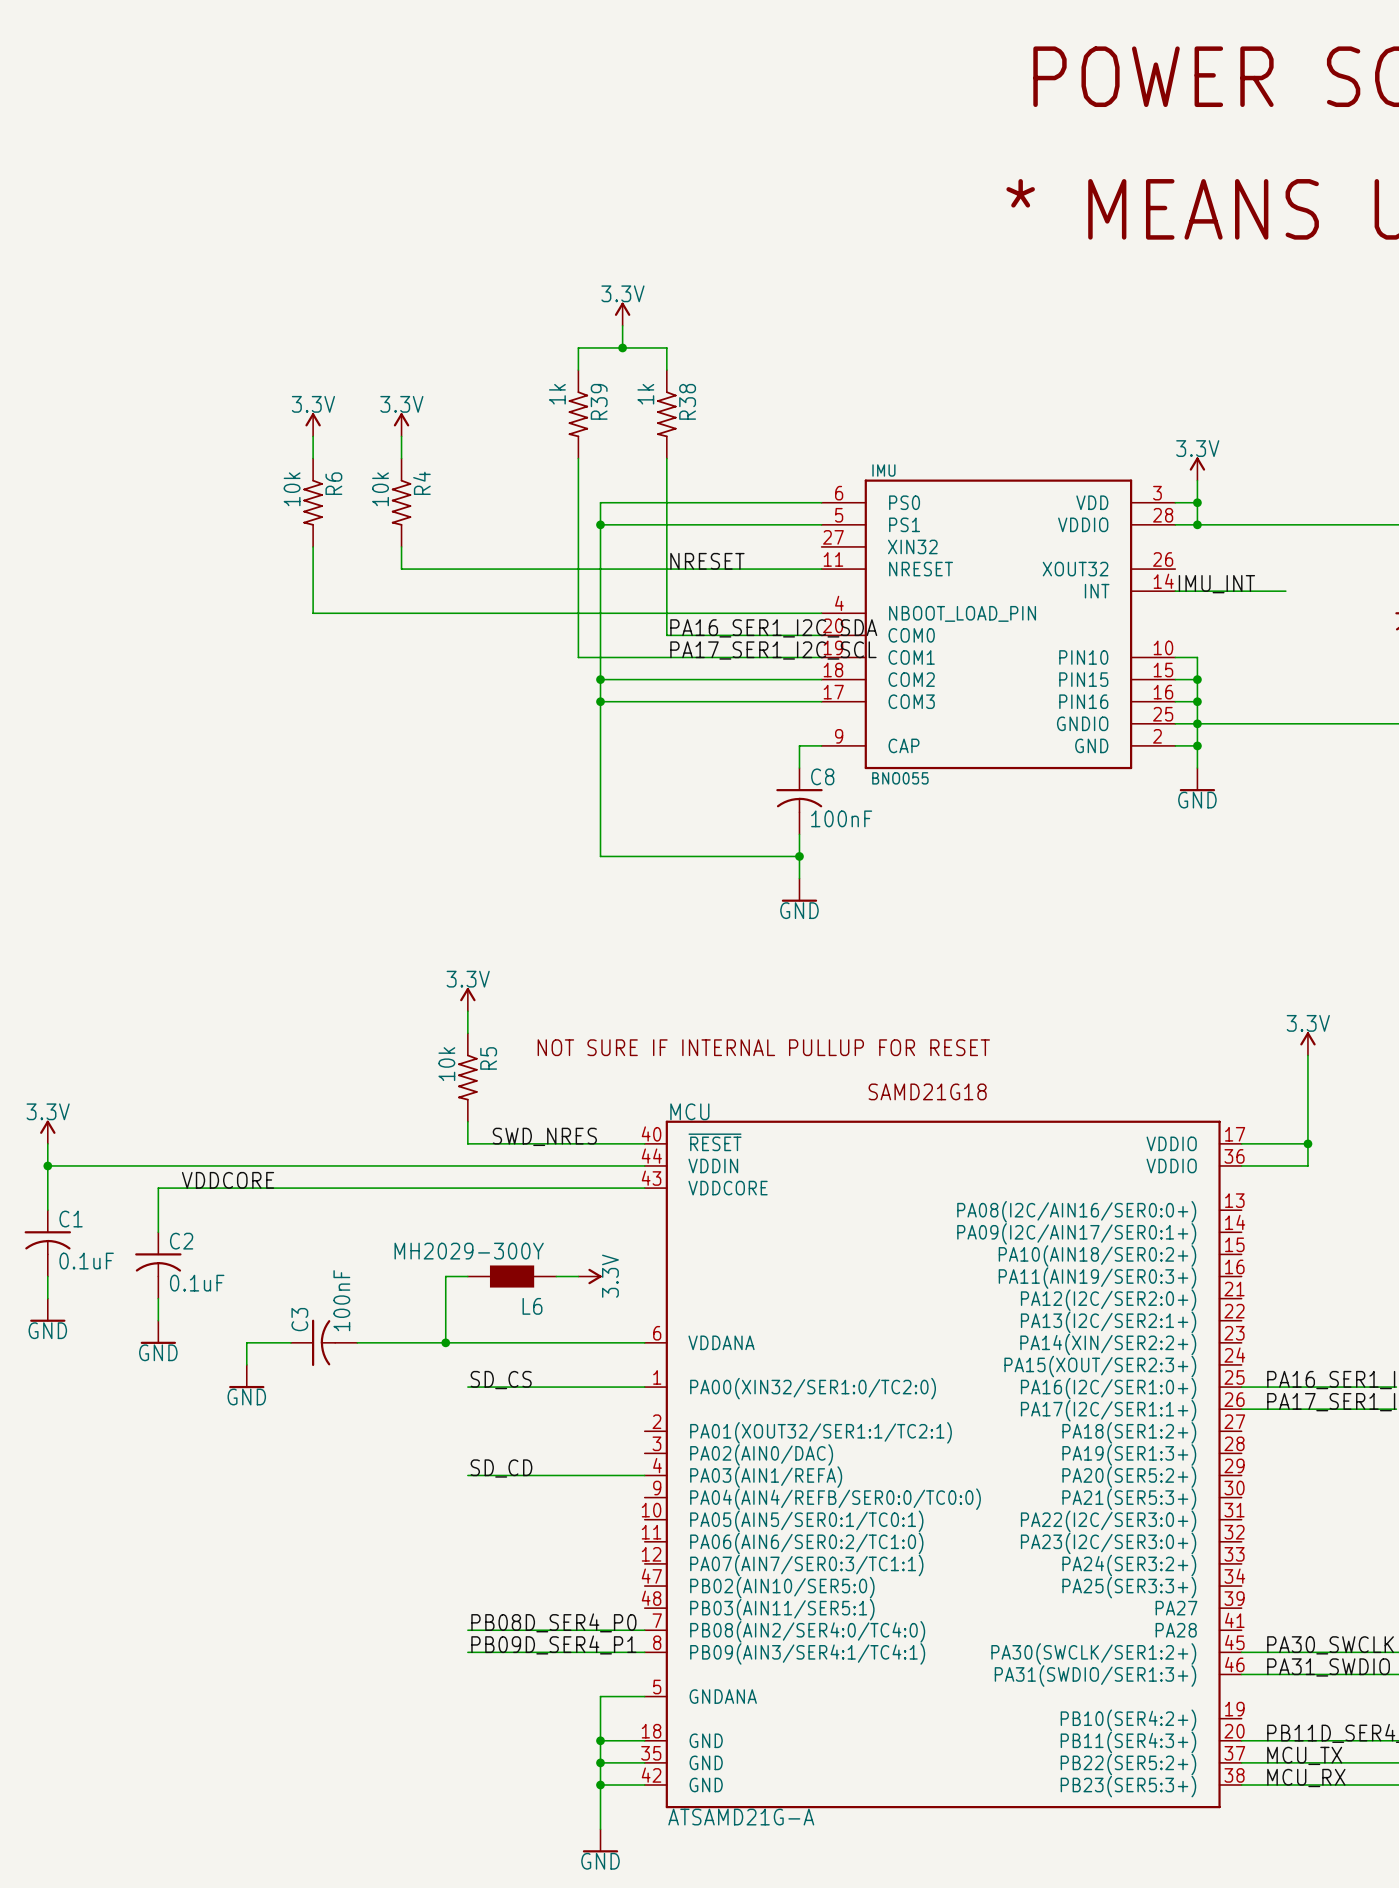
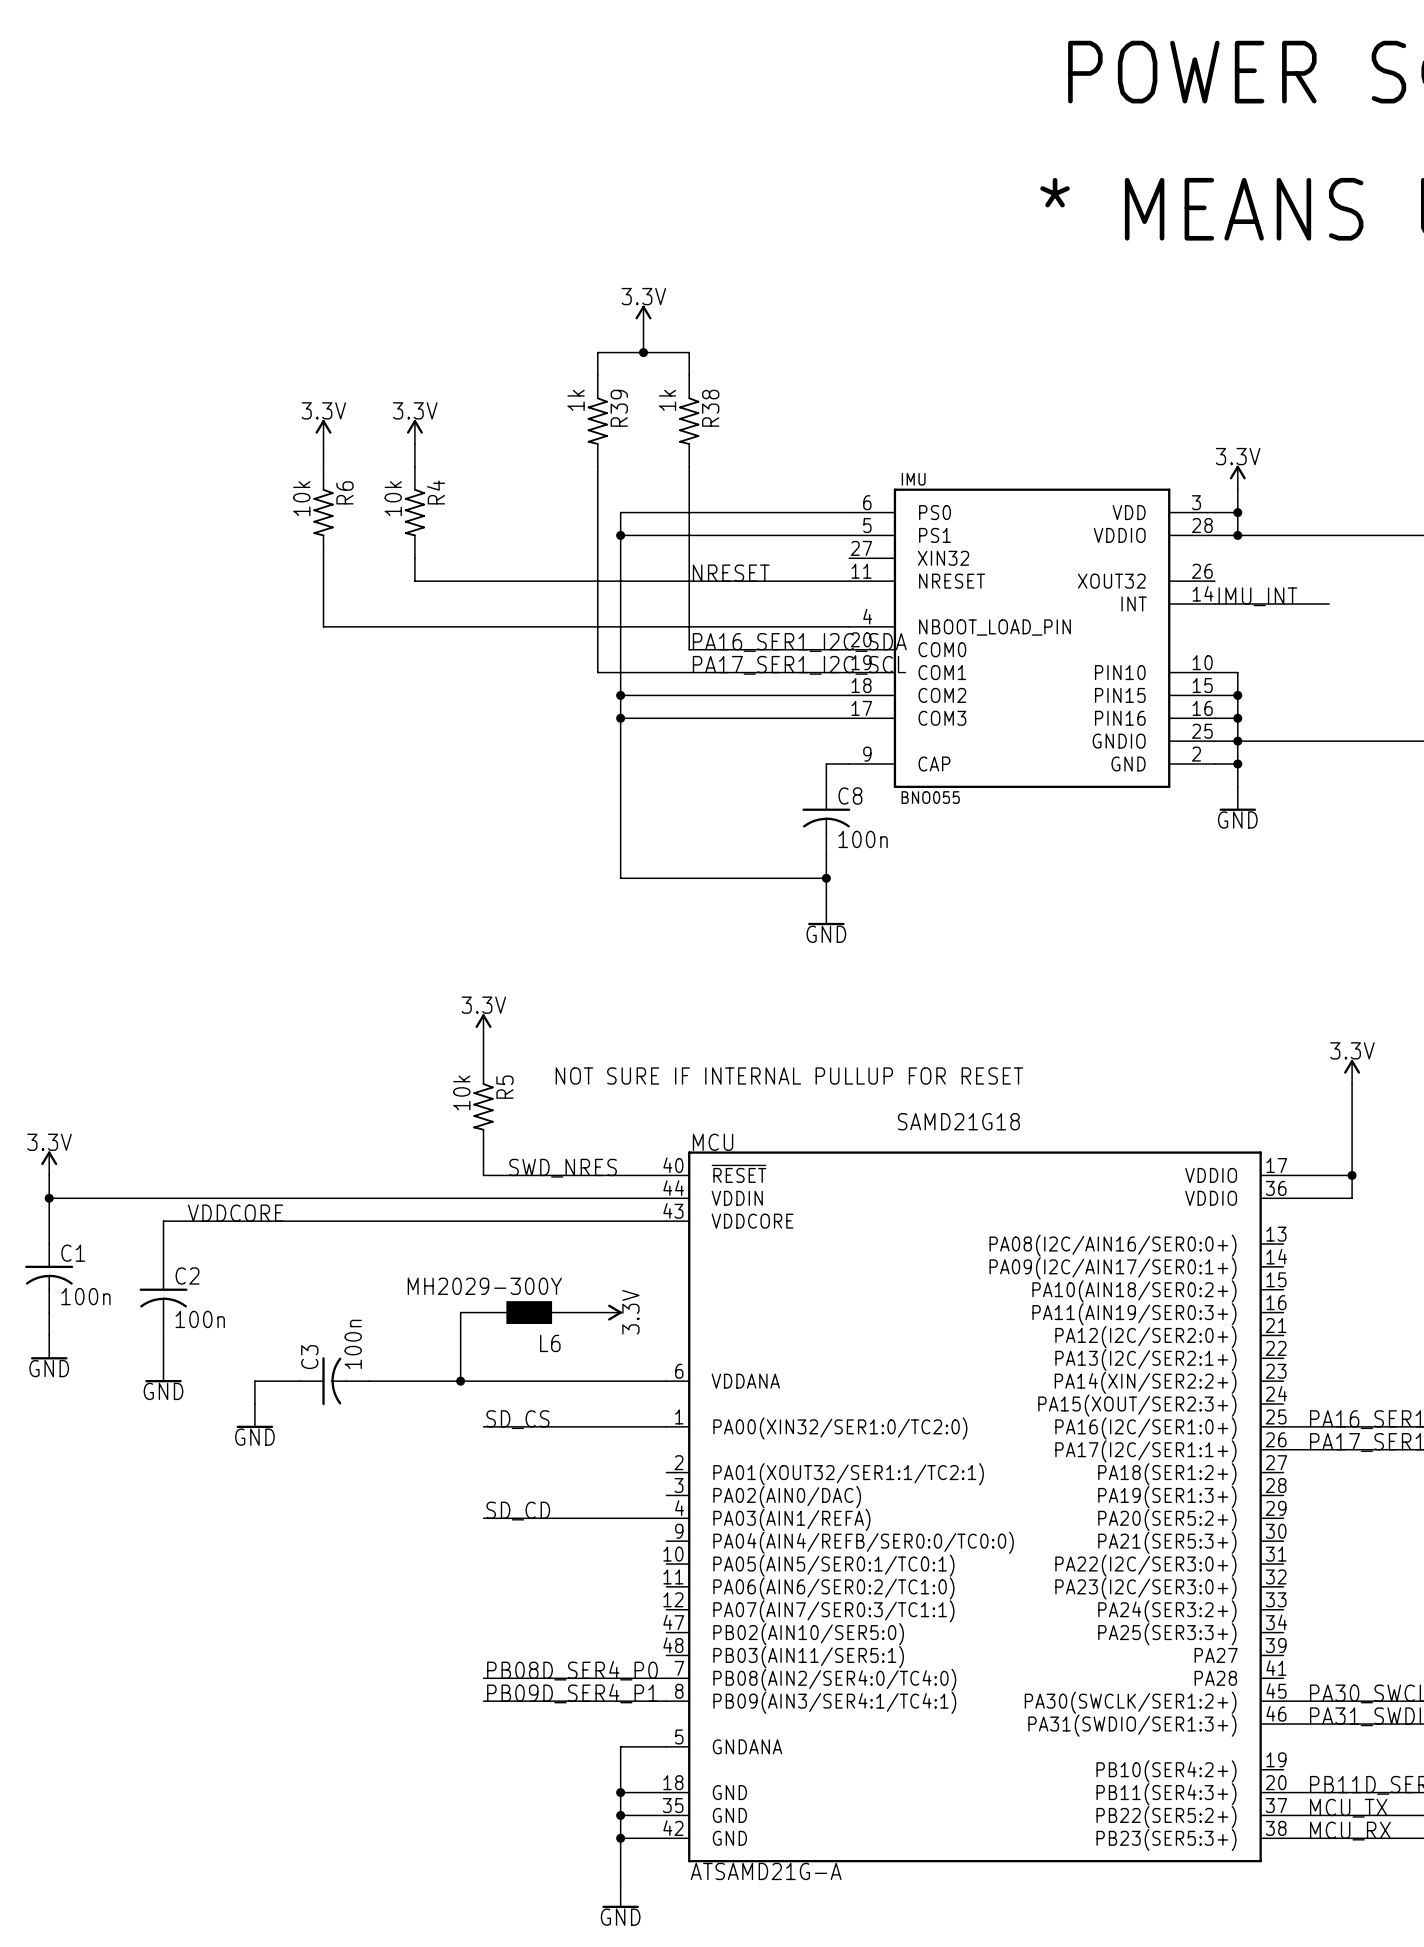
C8 value: 100nF (841, 818) -> 100n (863, 839)
C1 value: 0.1uF (86, 1261) -> 100n (85, 1296)
C2 value: 0.1uF (197, 1283) -> 100n (200, 1319)
C3 value: 100nF (341, 1300) -> 100n (353, 1344)

